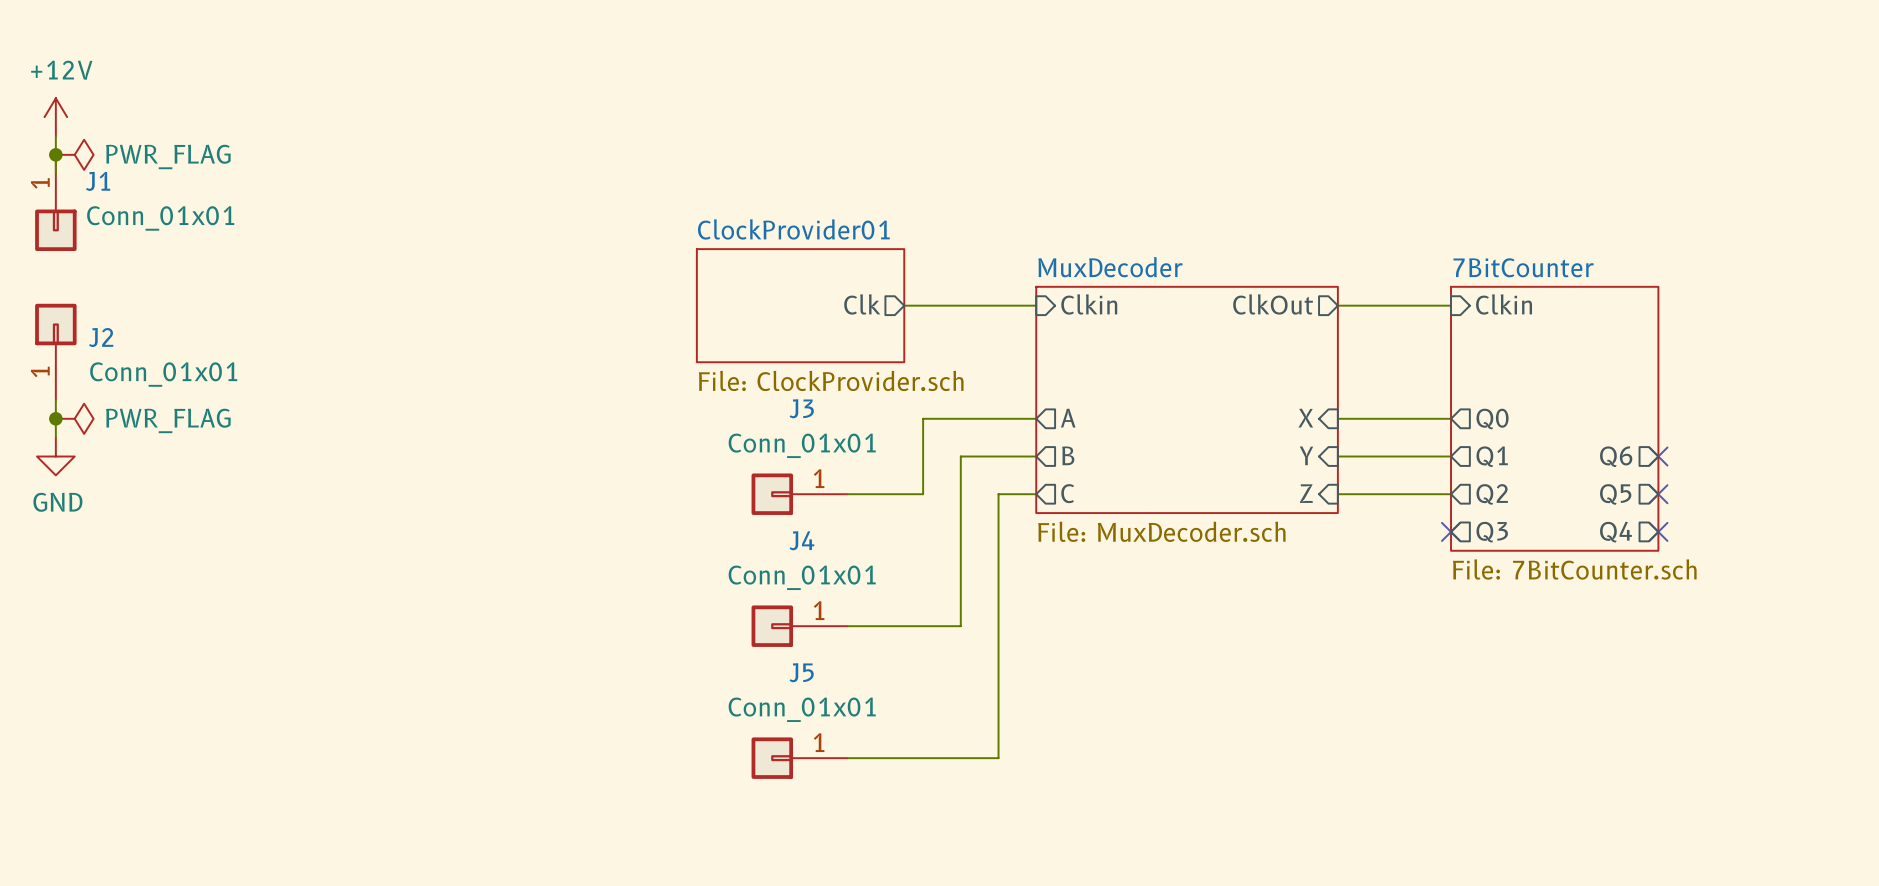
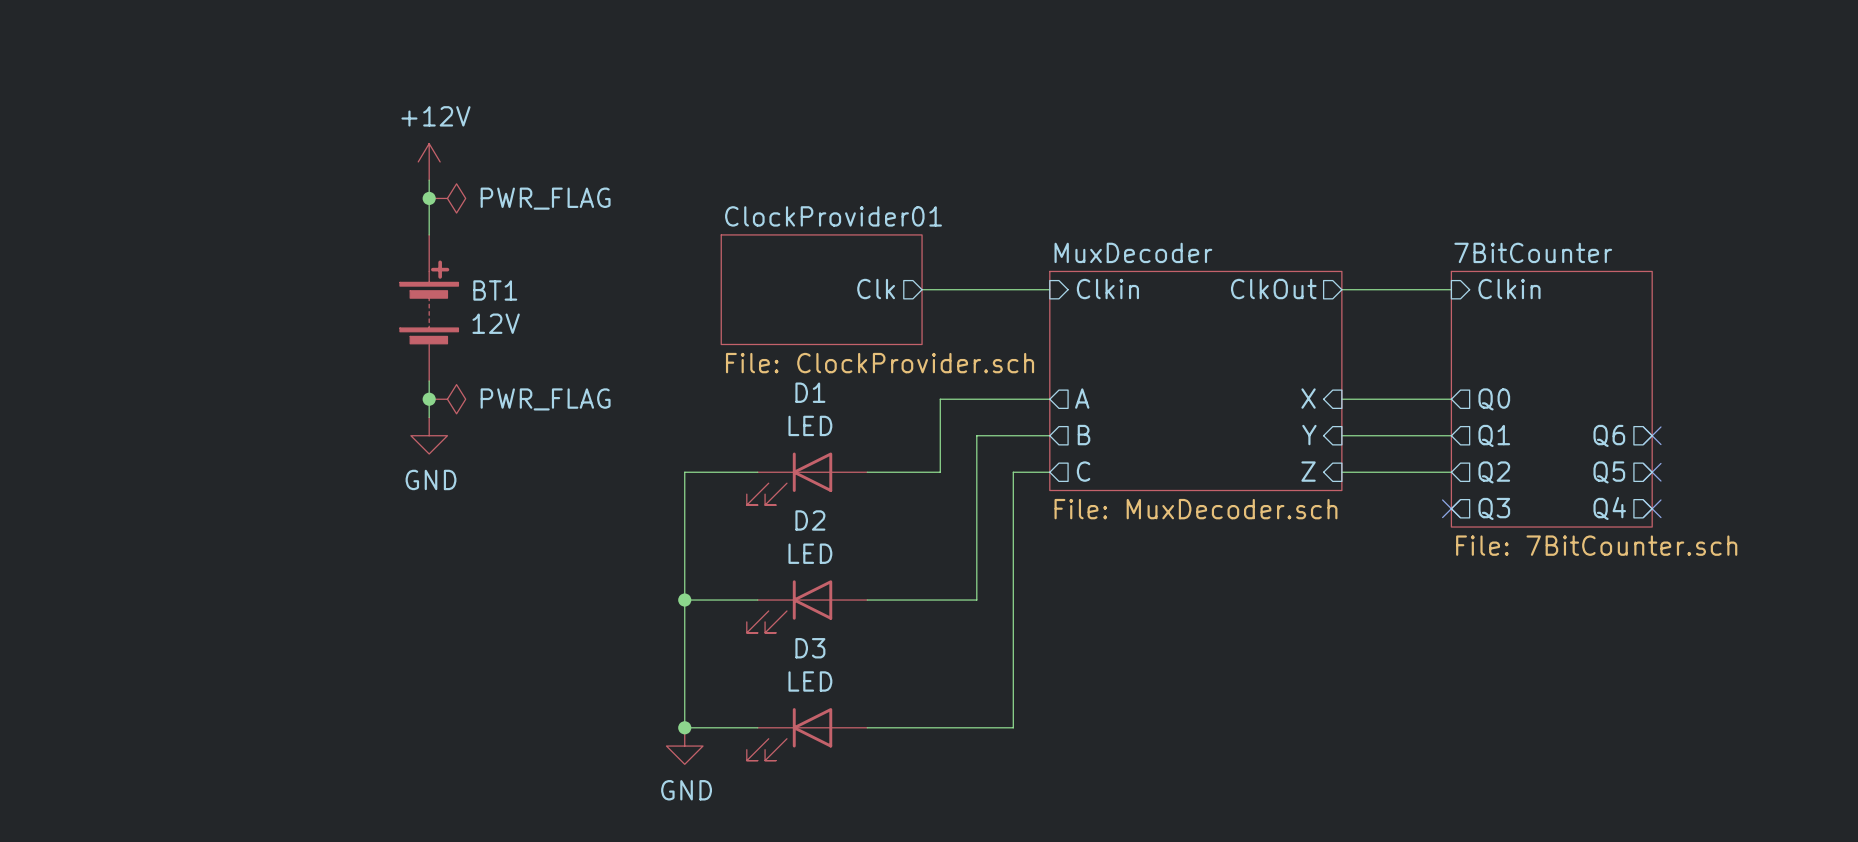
power symbol position: +12V (55, 117) -> +12V (429, 161)
wire: (55, 135) (55, 173) -> none
junction: (55, 154) -> none
power symbol: PWR_FLAG (74, 154) -> none
wire: none -> (429, 180) (429, 234)
J1: Conn_01x01 (55, 202) -> none
junction: none -> (429, 198)
power symbol: none -> PWR_FLAG (447, 198)
BT1: none -> 12V (429, 307)
J2: Conn_01x01 (55, 351) -> none
wire: (55, 399) (55, 437) -> (429, 380) (429, 417)
junction: (55, 418) -> none
power symbol: PWR_FLAG (74, 418) -> none
junction: none -> (429, 399)
power symbol: none -> PWR_FLAG (447, 399)
power symbol position: GND (55, 456) -> GND (429, 435)
wire: none -> (757, 472) (684, 472) (684, 727) (757, 727)
J3: Conn_01x01 (799, 494) -> none
D1: none -> LED (807, 478)
wire: none -> (684, 600) (757, 600)
junction: none -> (684, 600)
J4: Conn_01x01 (799, 626) -> none
D2: none -> LED (807, 606)
junction: none -> (684, 727)
J5: Conn_01x01 (799, 758) -> none
D3: none -> LED (807, 734)
power symbol: none -> GND (684, 746)

